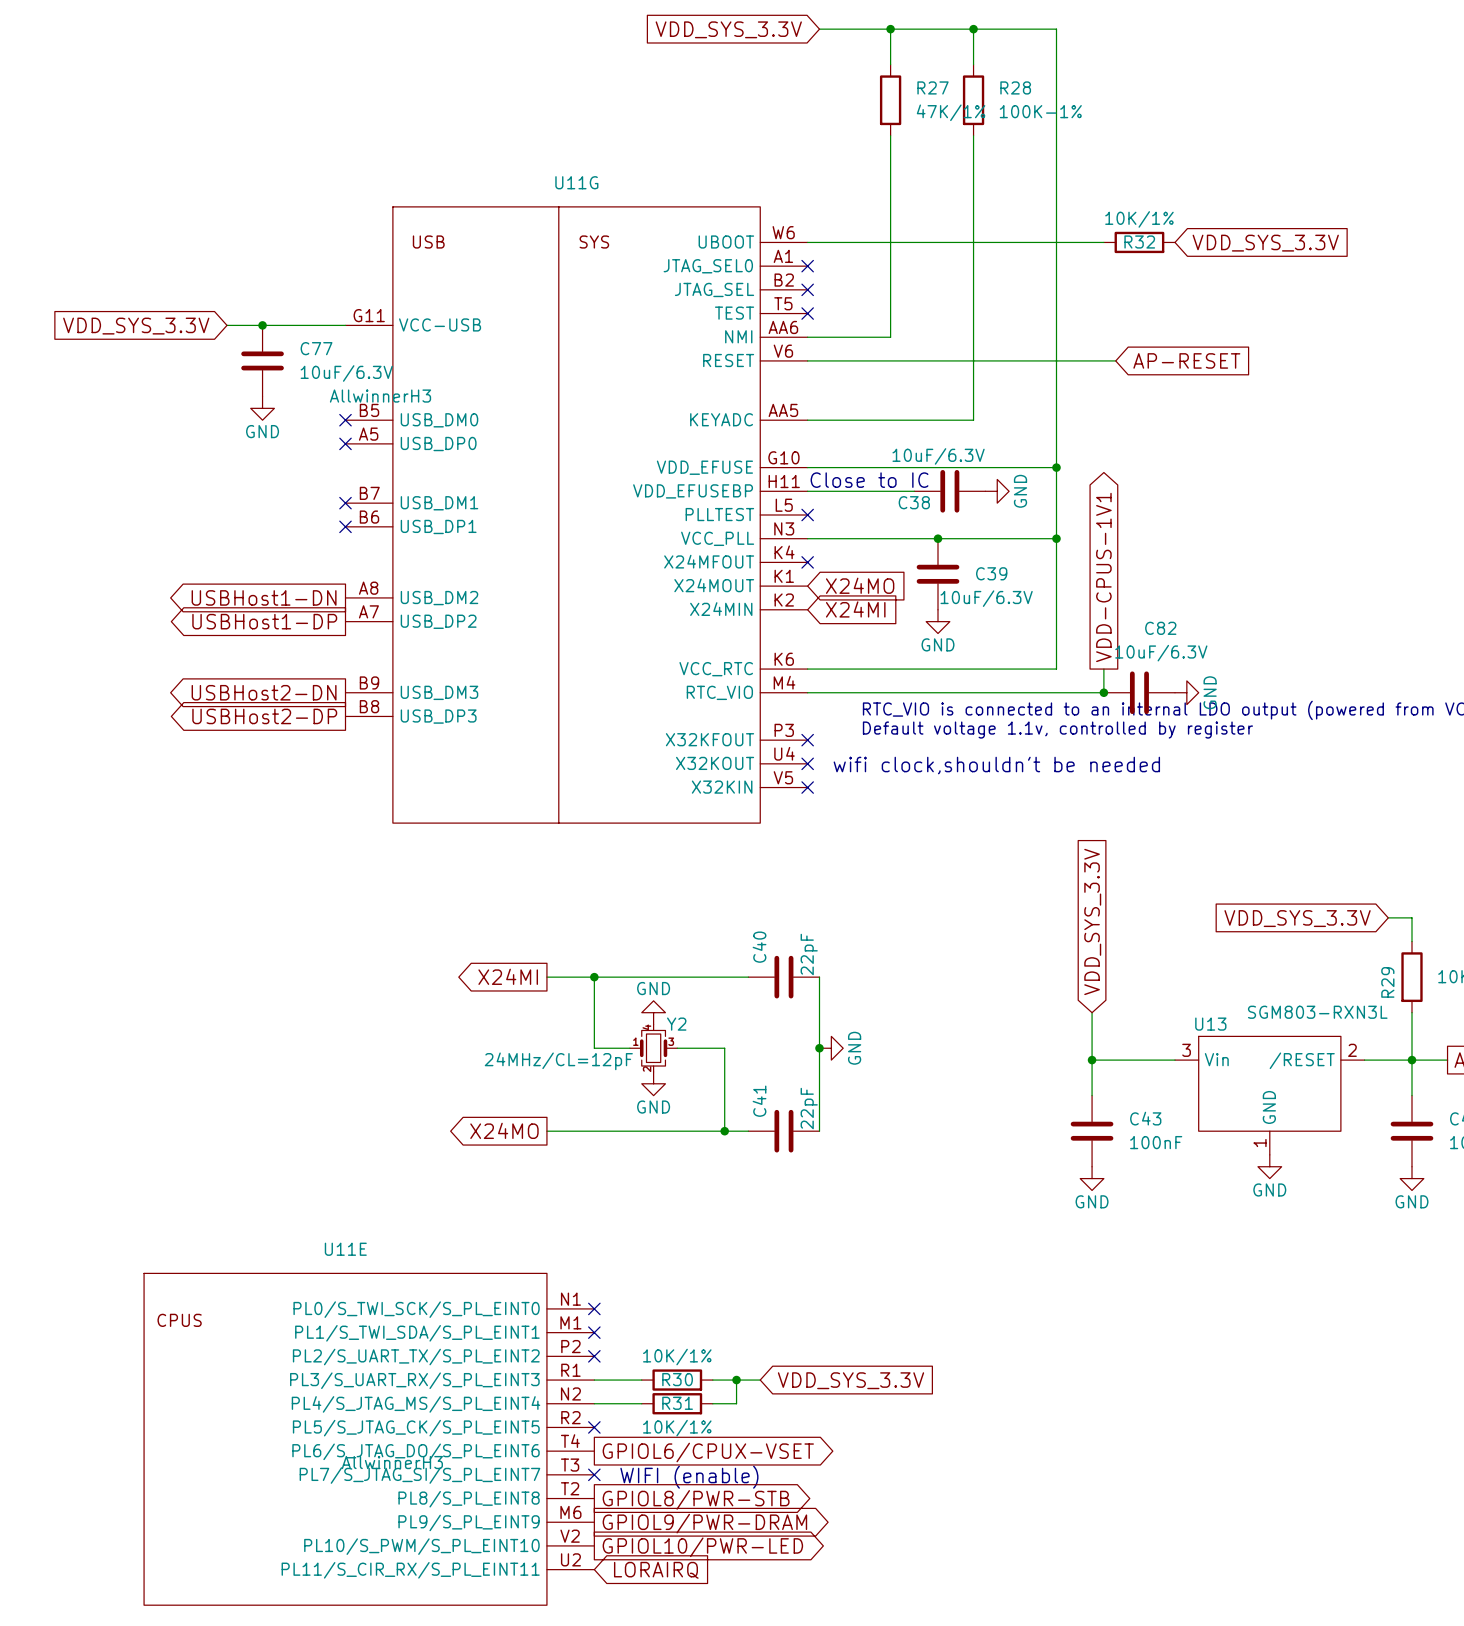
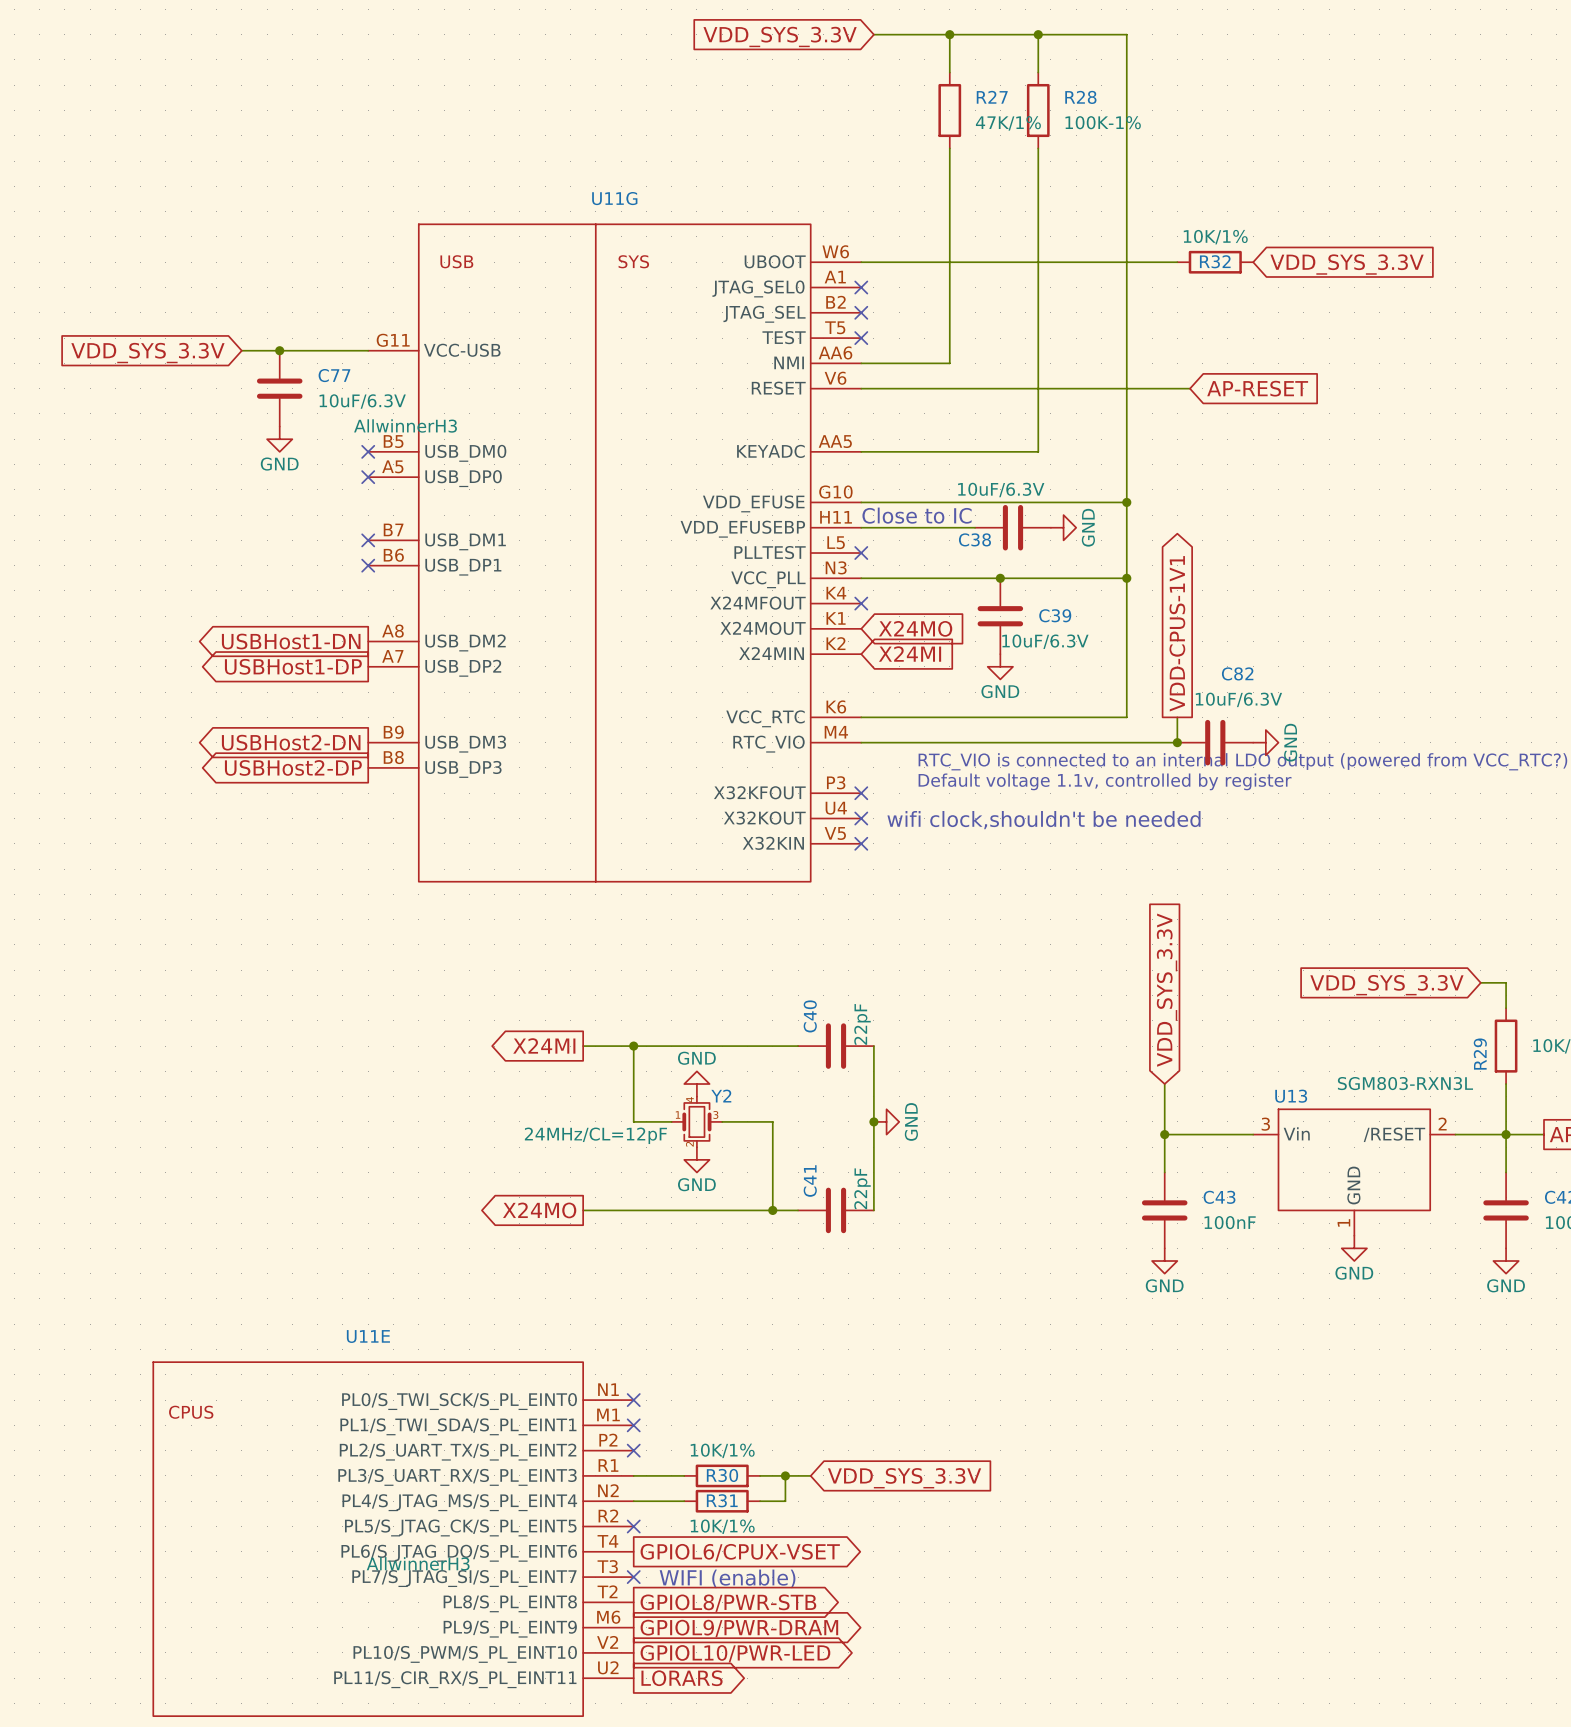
global label shape: input (656, 1570) -> output (682, 1678)
global label: LORAIRQ (656, 1570) -> LORARS (682, 1678)

